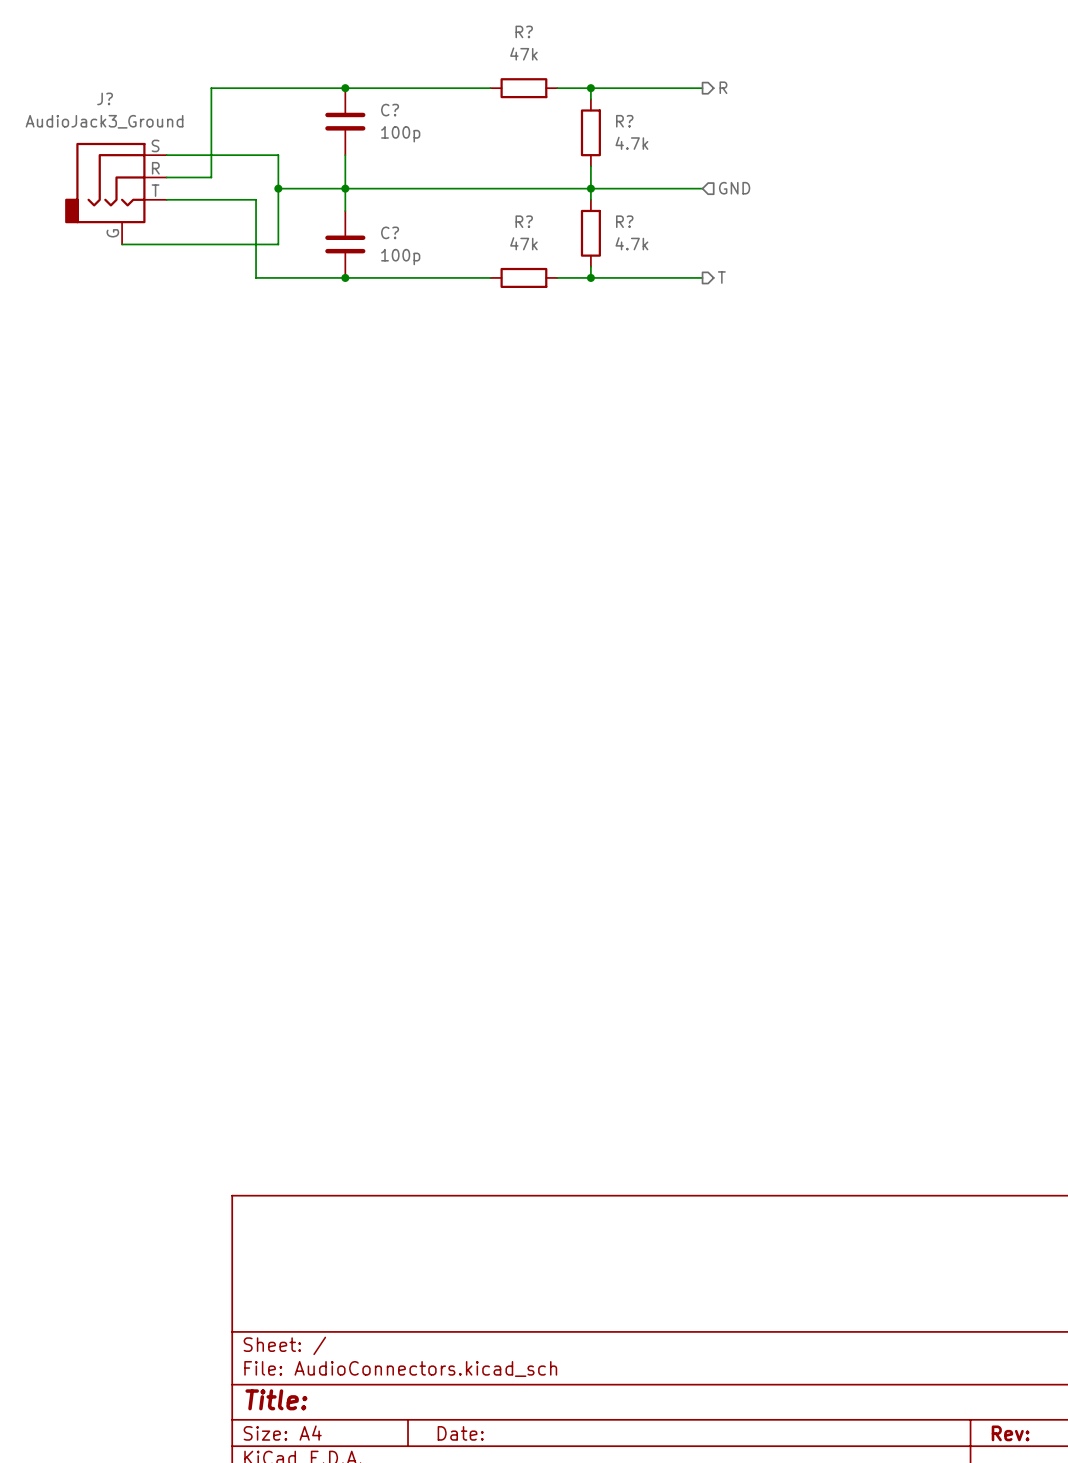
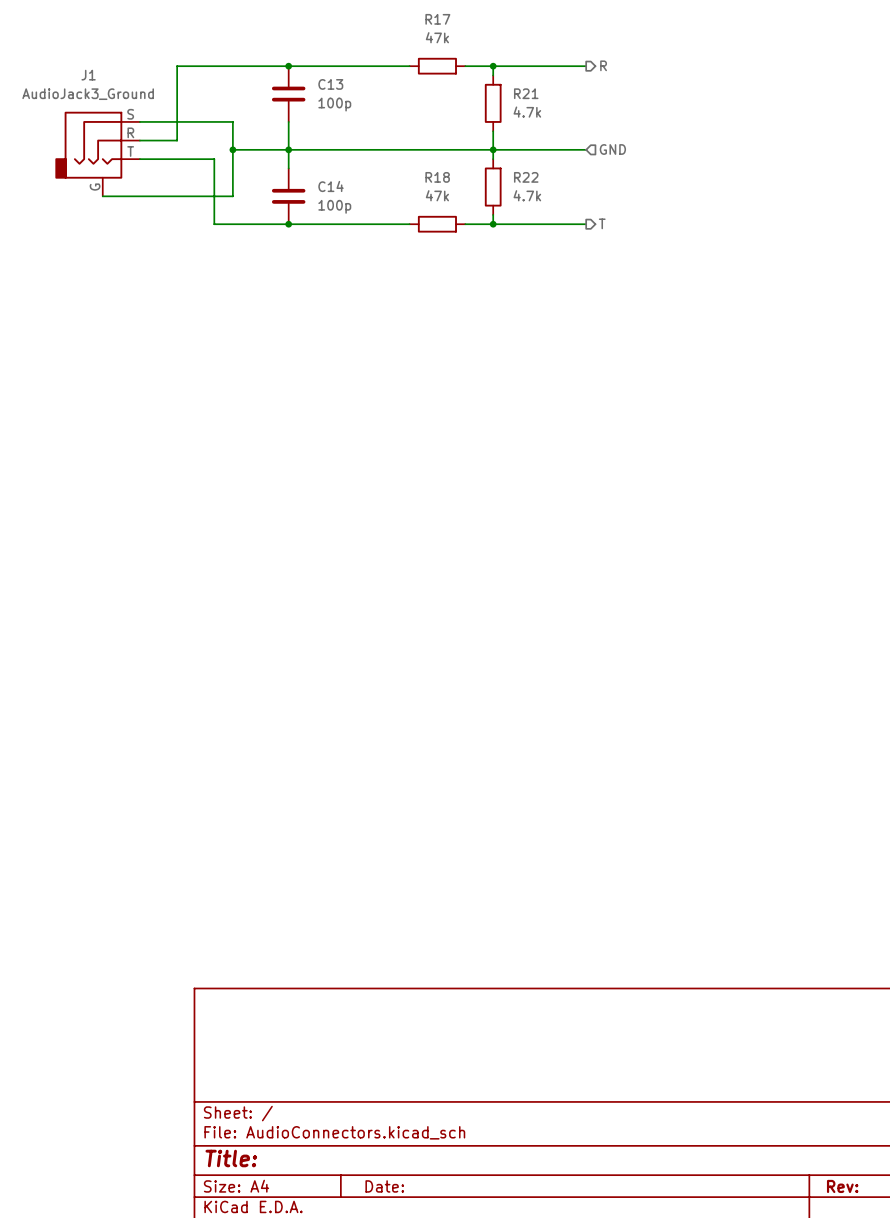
R? name: R? (524, 31) -> R17 (437, 19)
J? name: J? (105, 98) -> J1 (88, 75)
C? name: C? (390, 110) -> C13 (330, 84)
R? name: R? (624, 121) -> R21 (526, 93)
R? name: R? (524, 221) -> R18 (437, 177)
R? name: R? (624, 221) -> R22 (526, 177)
C? name: C? (390, 232) -> C14 (331, 186)

